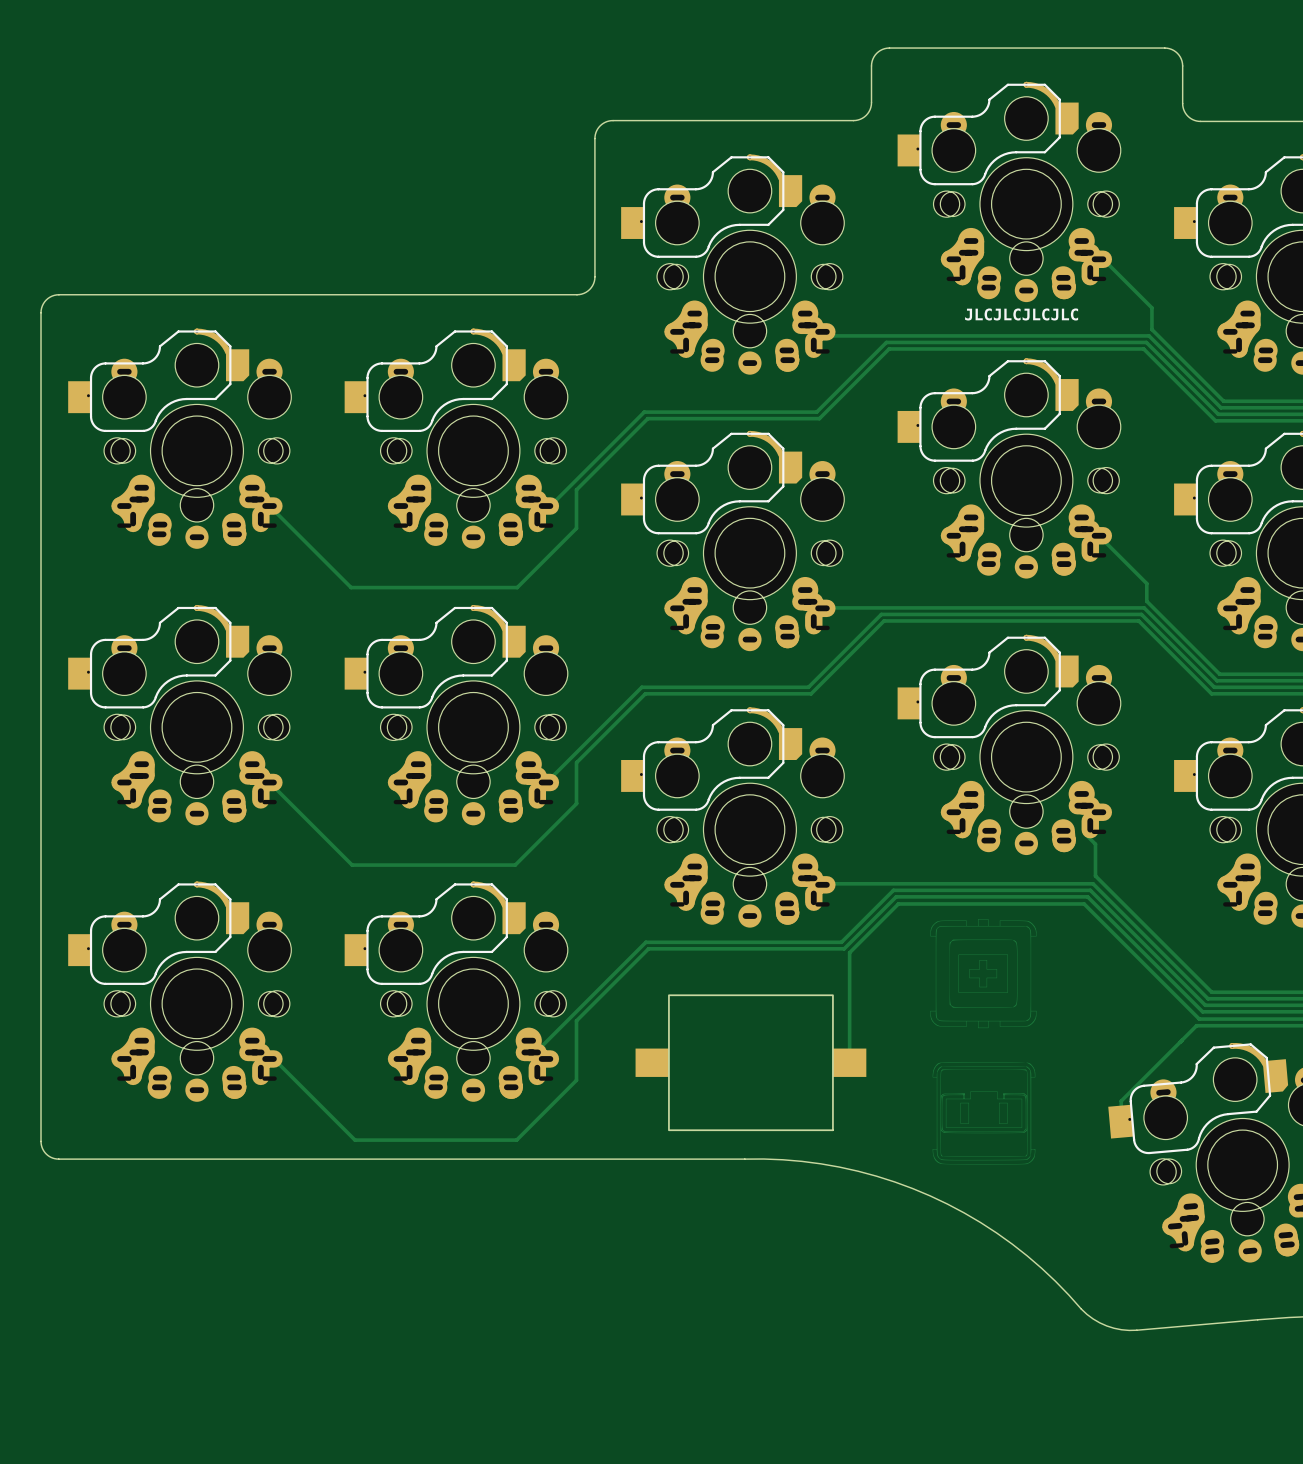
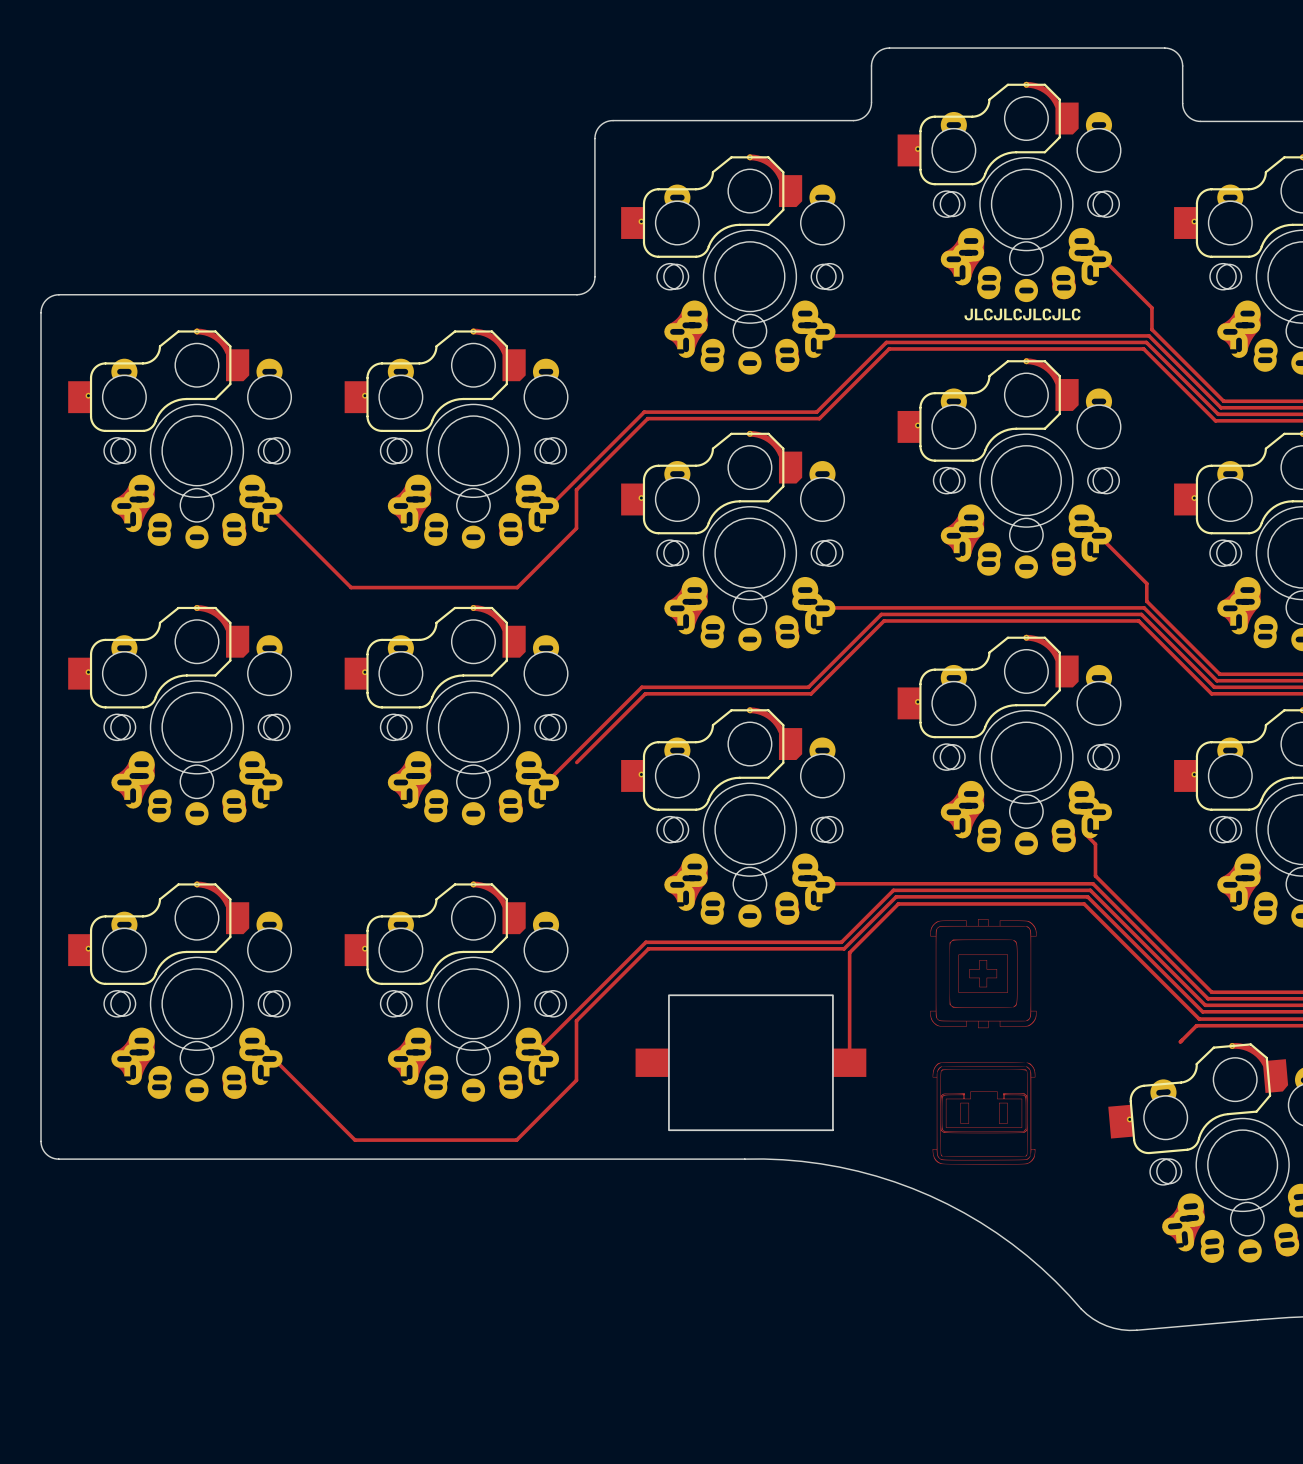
track: (576, 762) (576, 803) -> none
track: (269, 782) (352, 865) (515, 865) (576, 803) -> none
track: (1180, 1041) (1121, 1101) (1121, 1121) -> none

